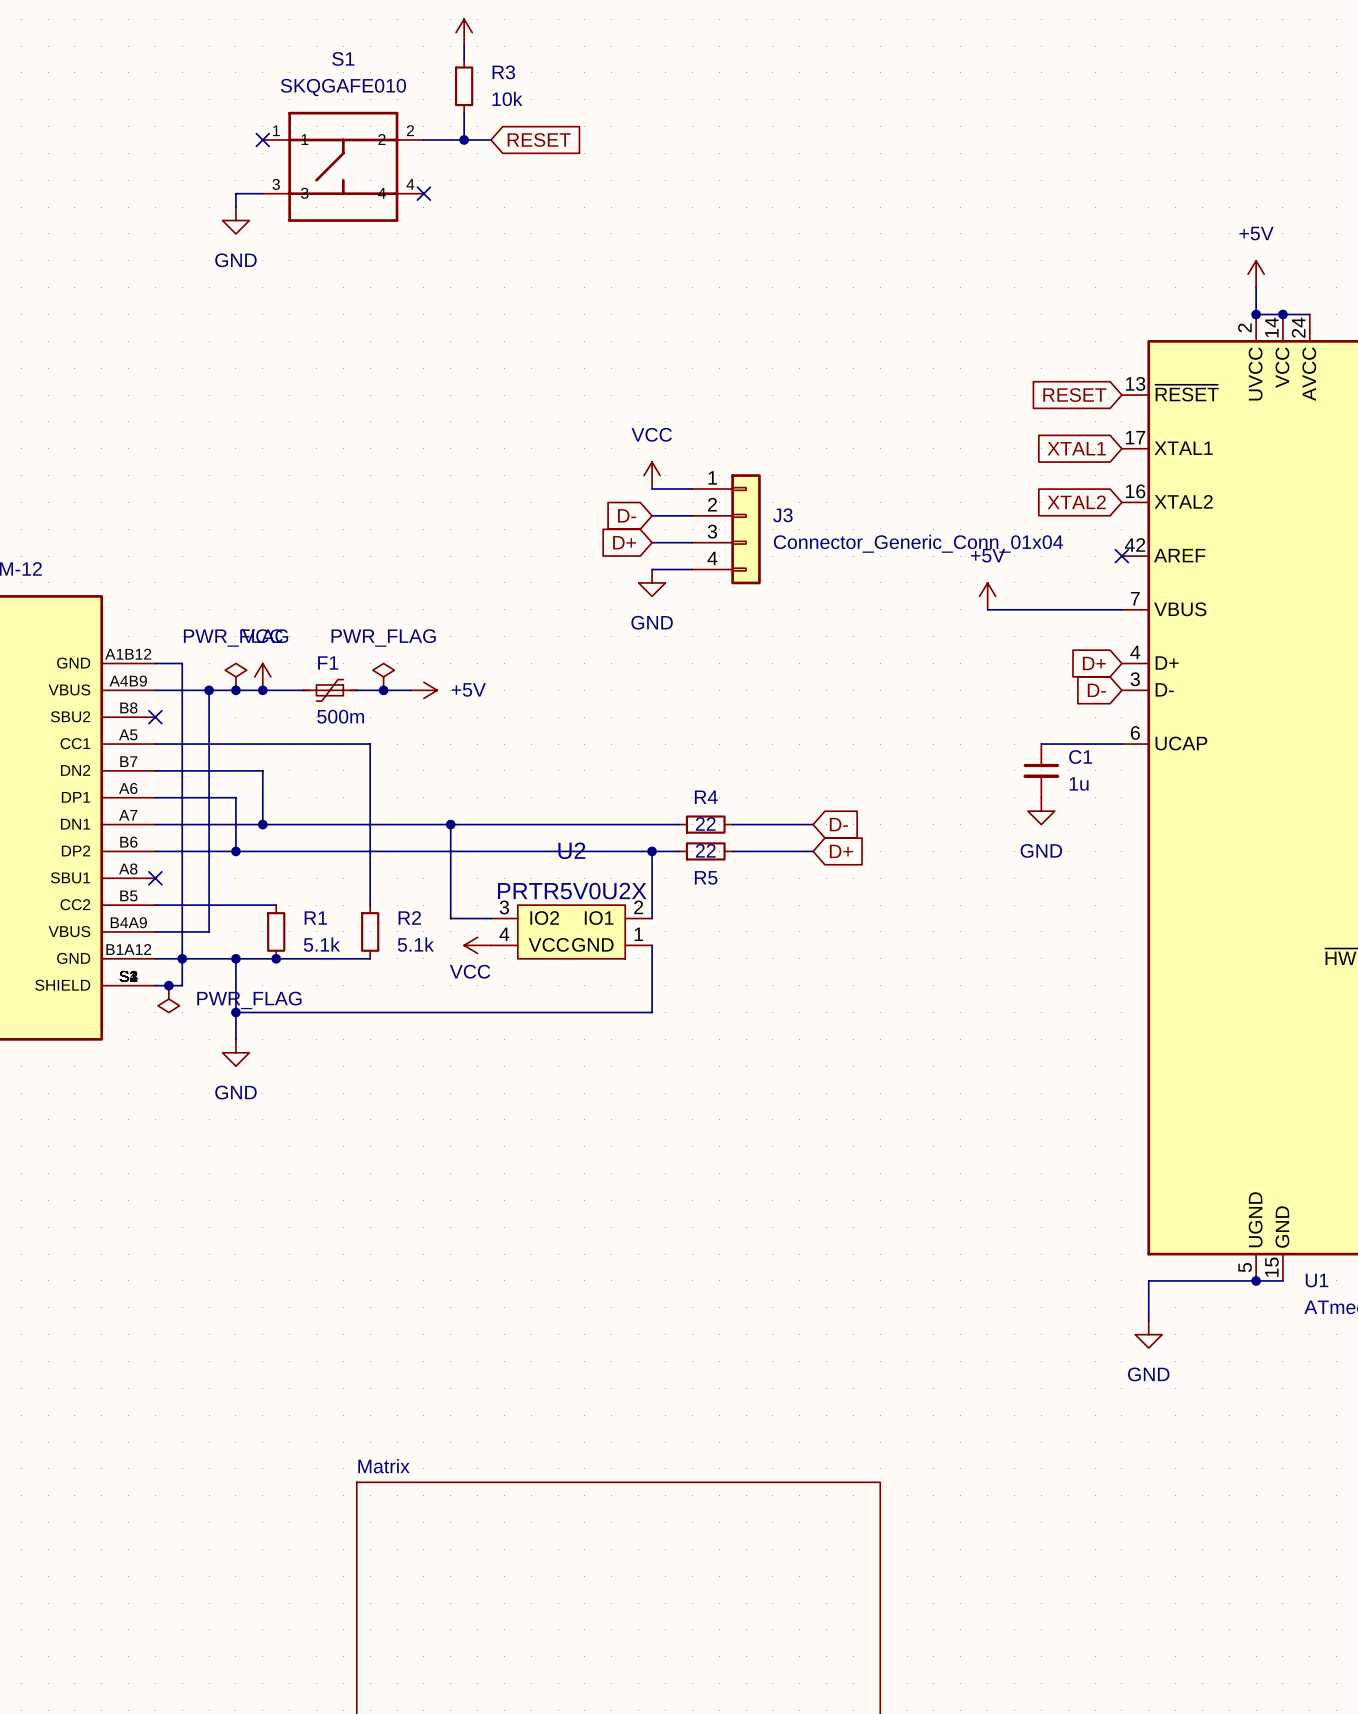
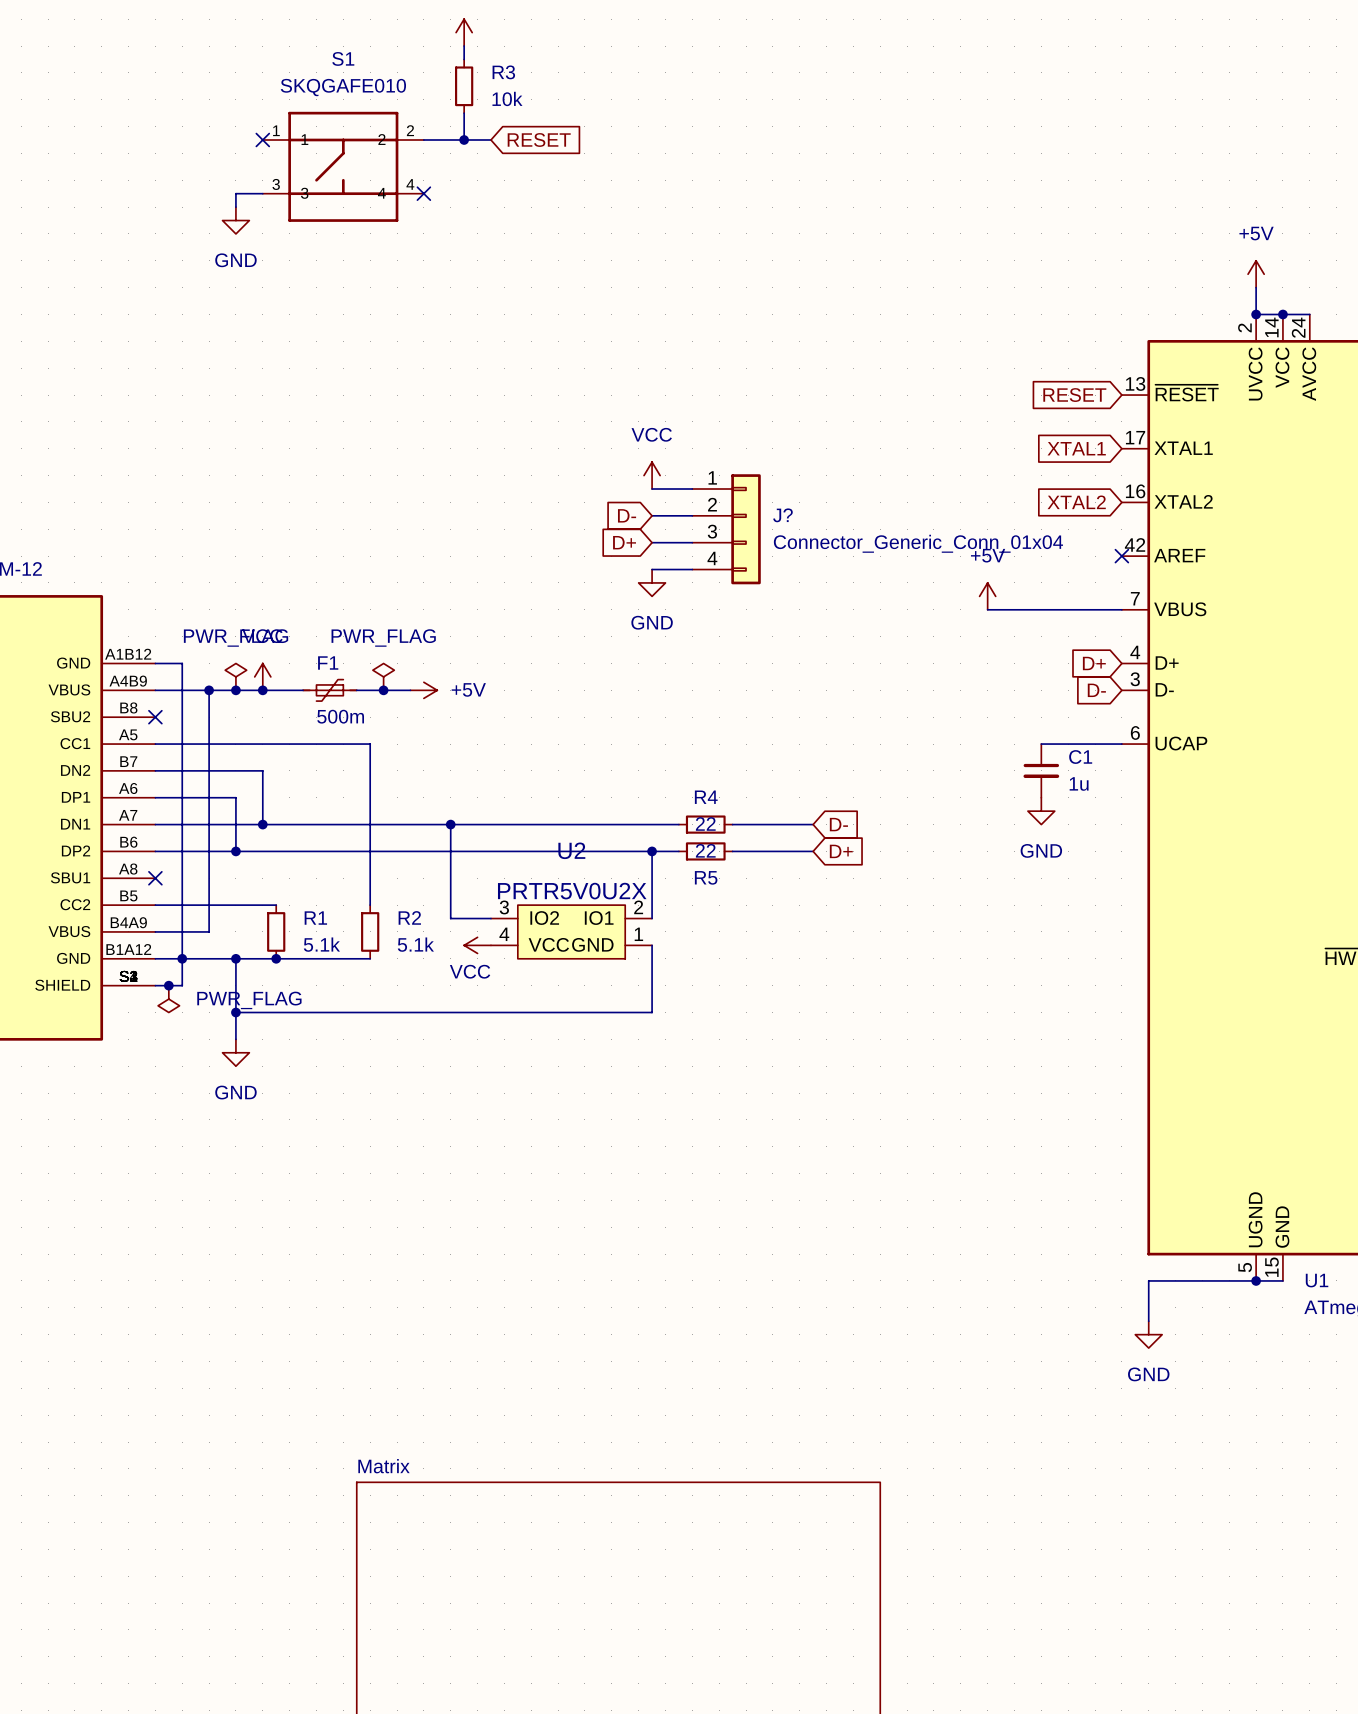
J3 name: J3 (782, 515) -> J? (782, 515)

